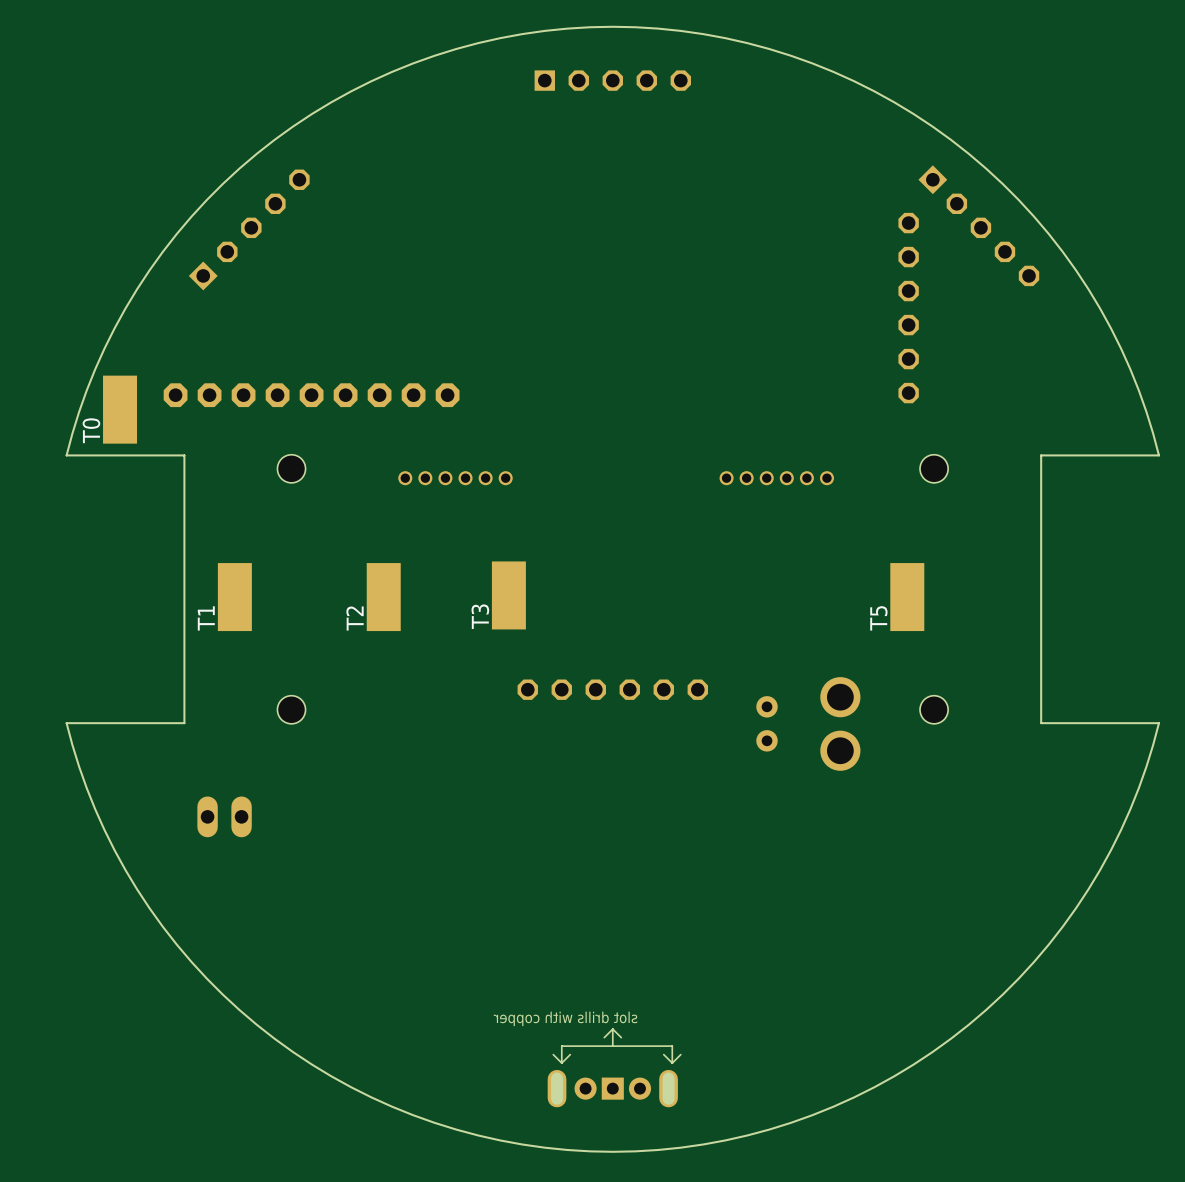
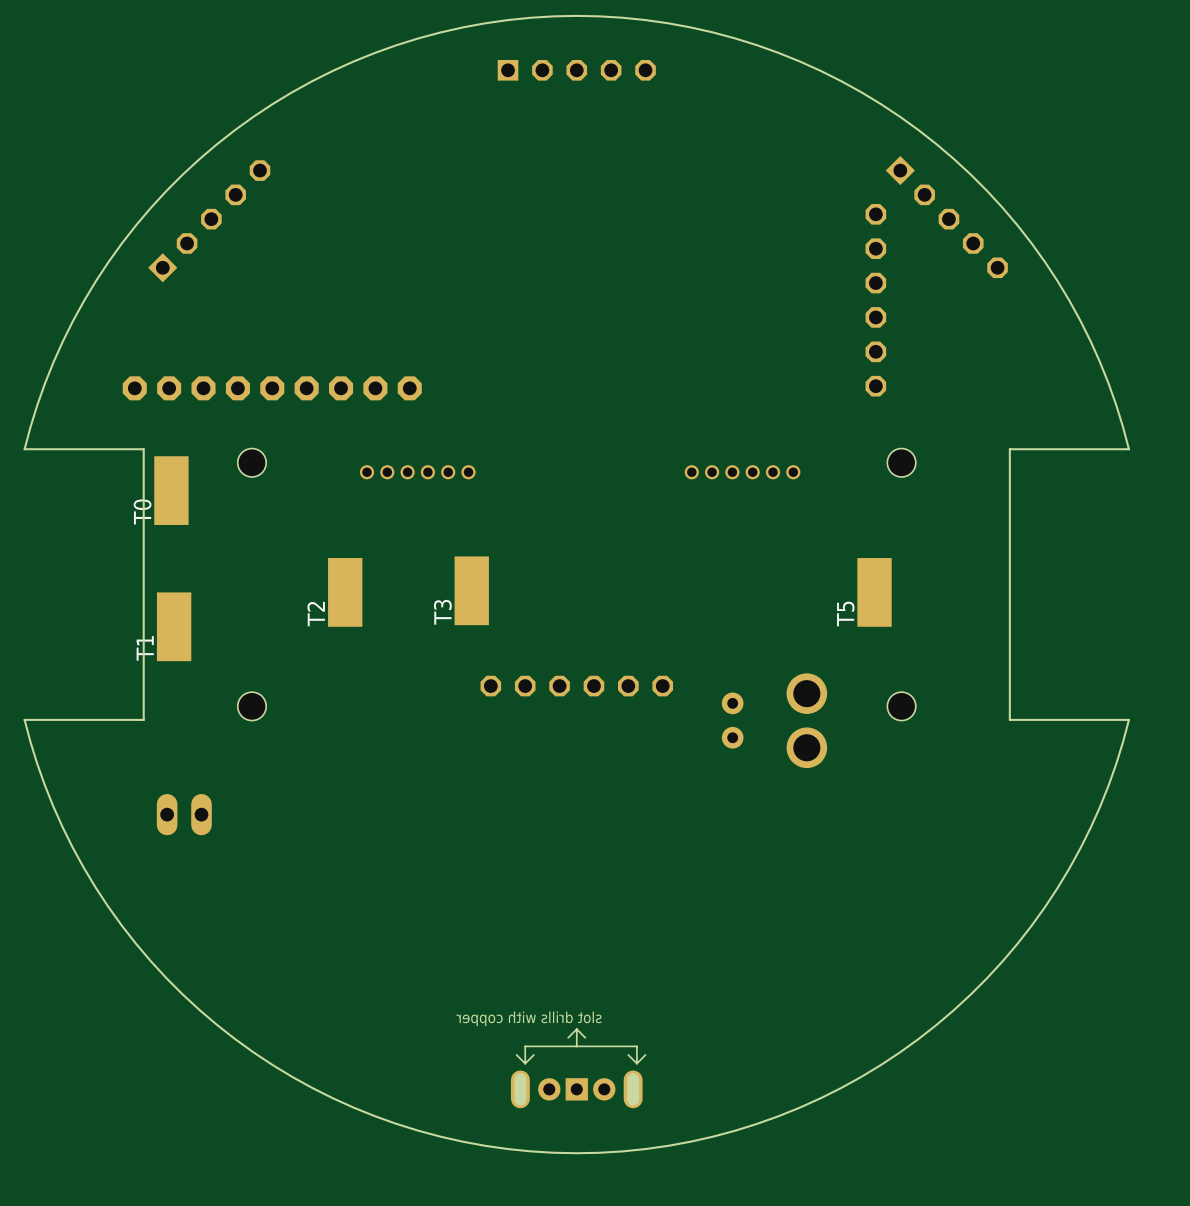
T0 position: (120, 409) -> (171, 490)
T1 position: (234, 597) -> (174, 626)

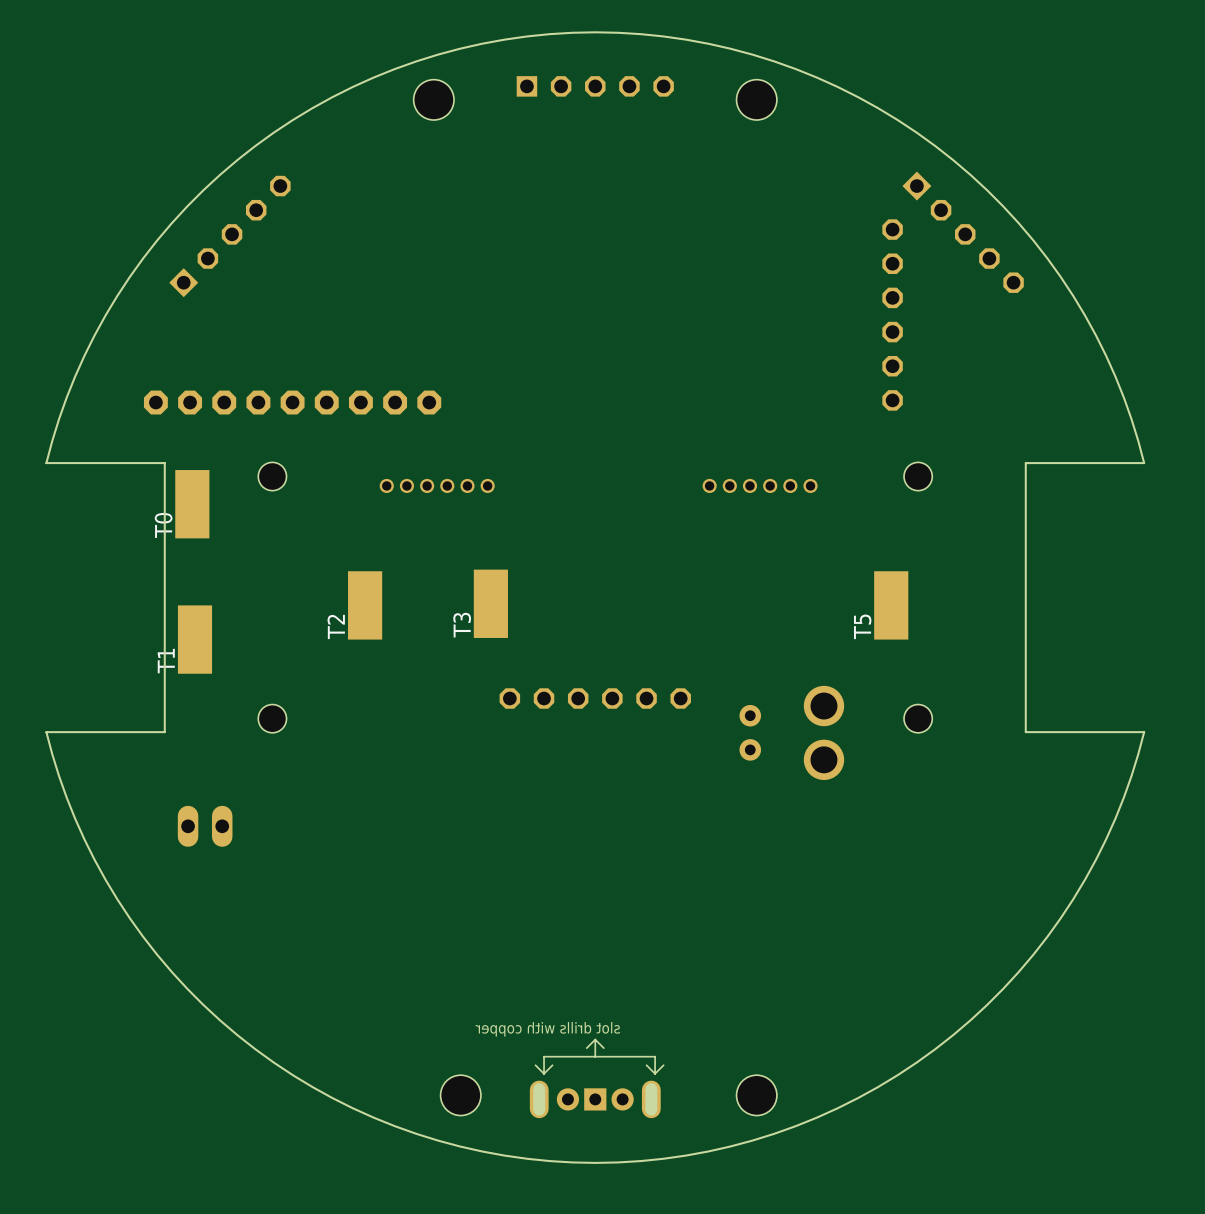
hole: none -> (433, 99)
hole: none -> (756, 99)
hole: none -> (460, 1095)
hole: none -> (756, 1095)

